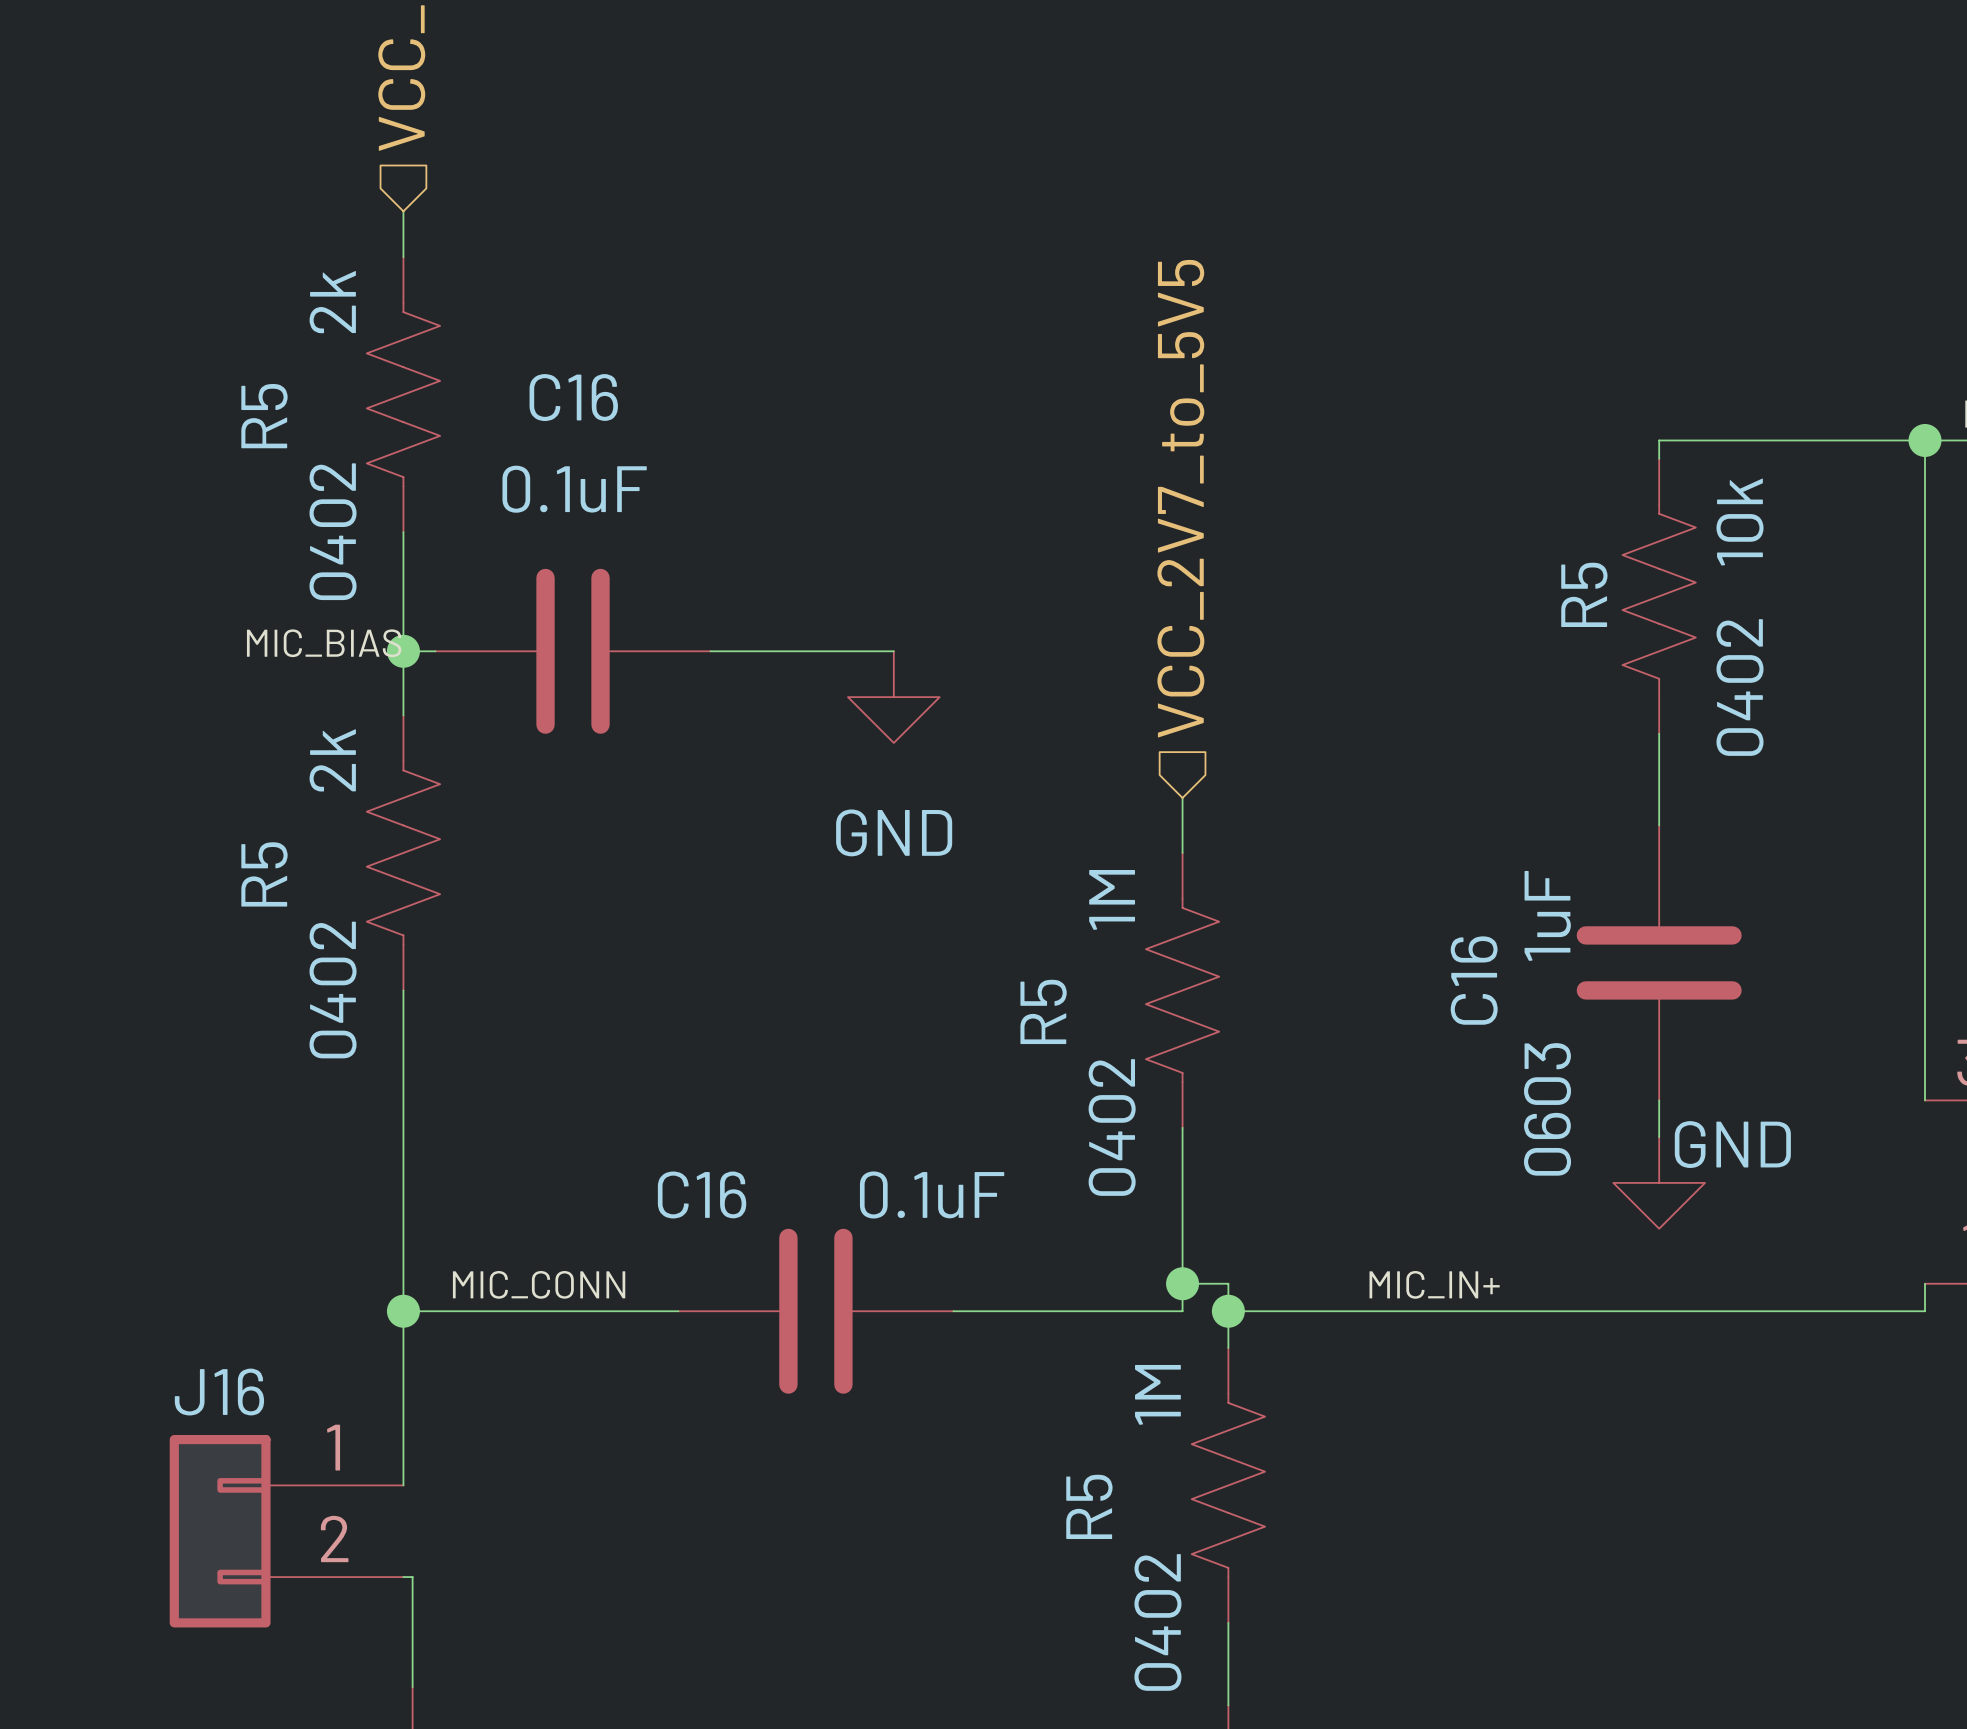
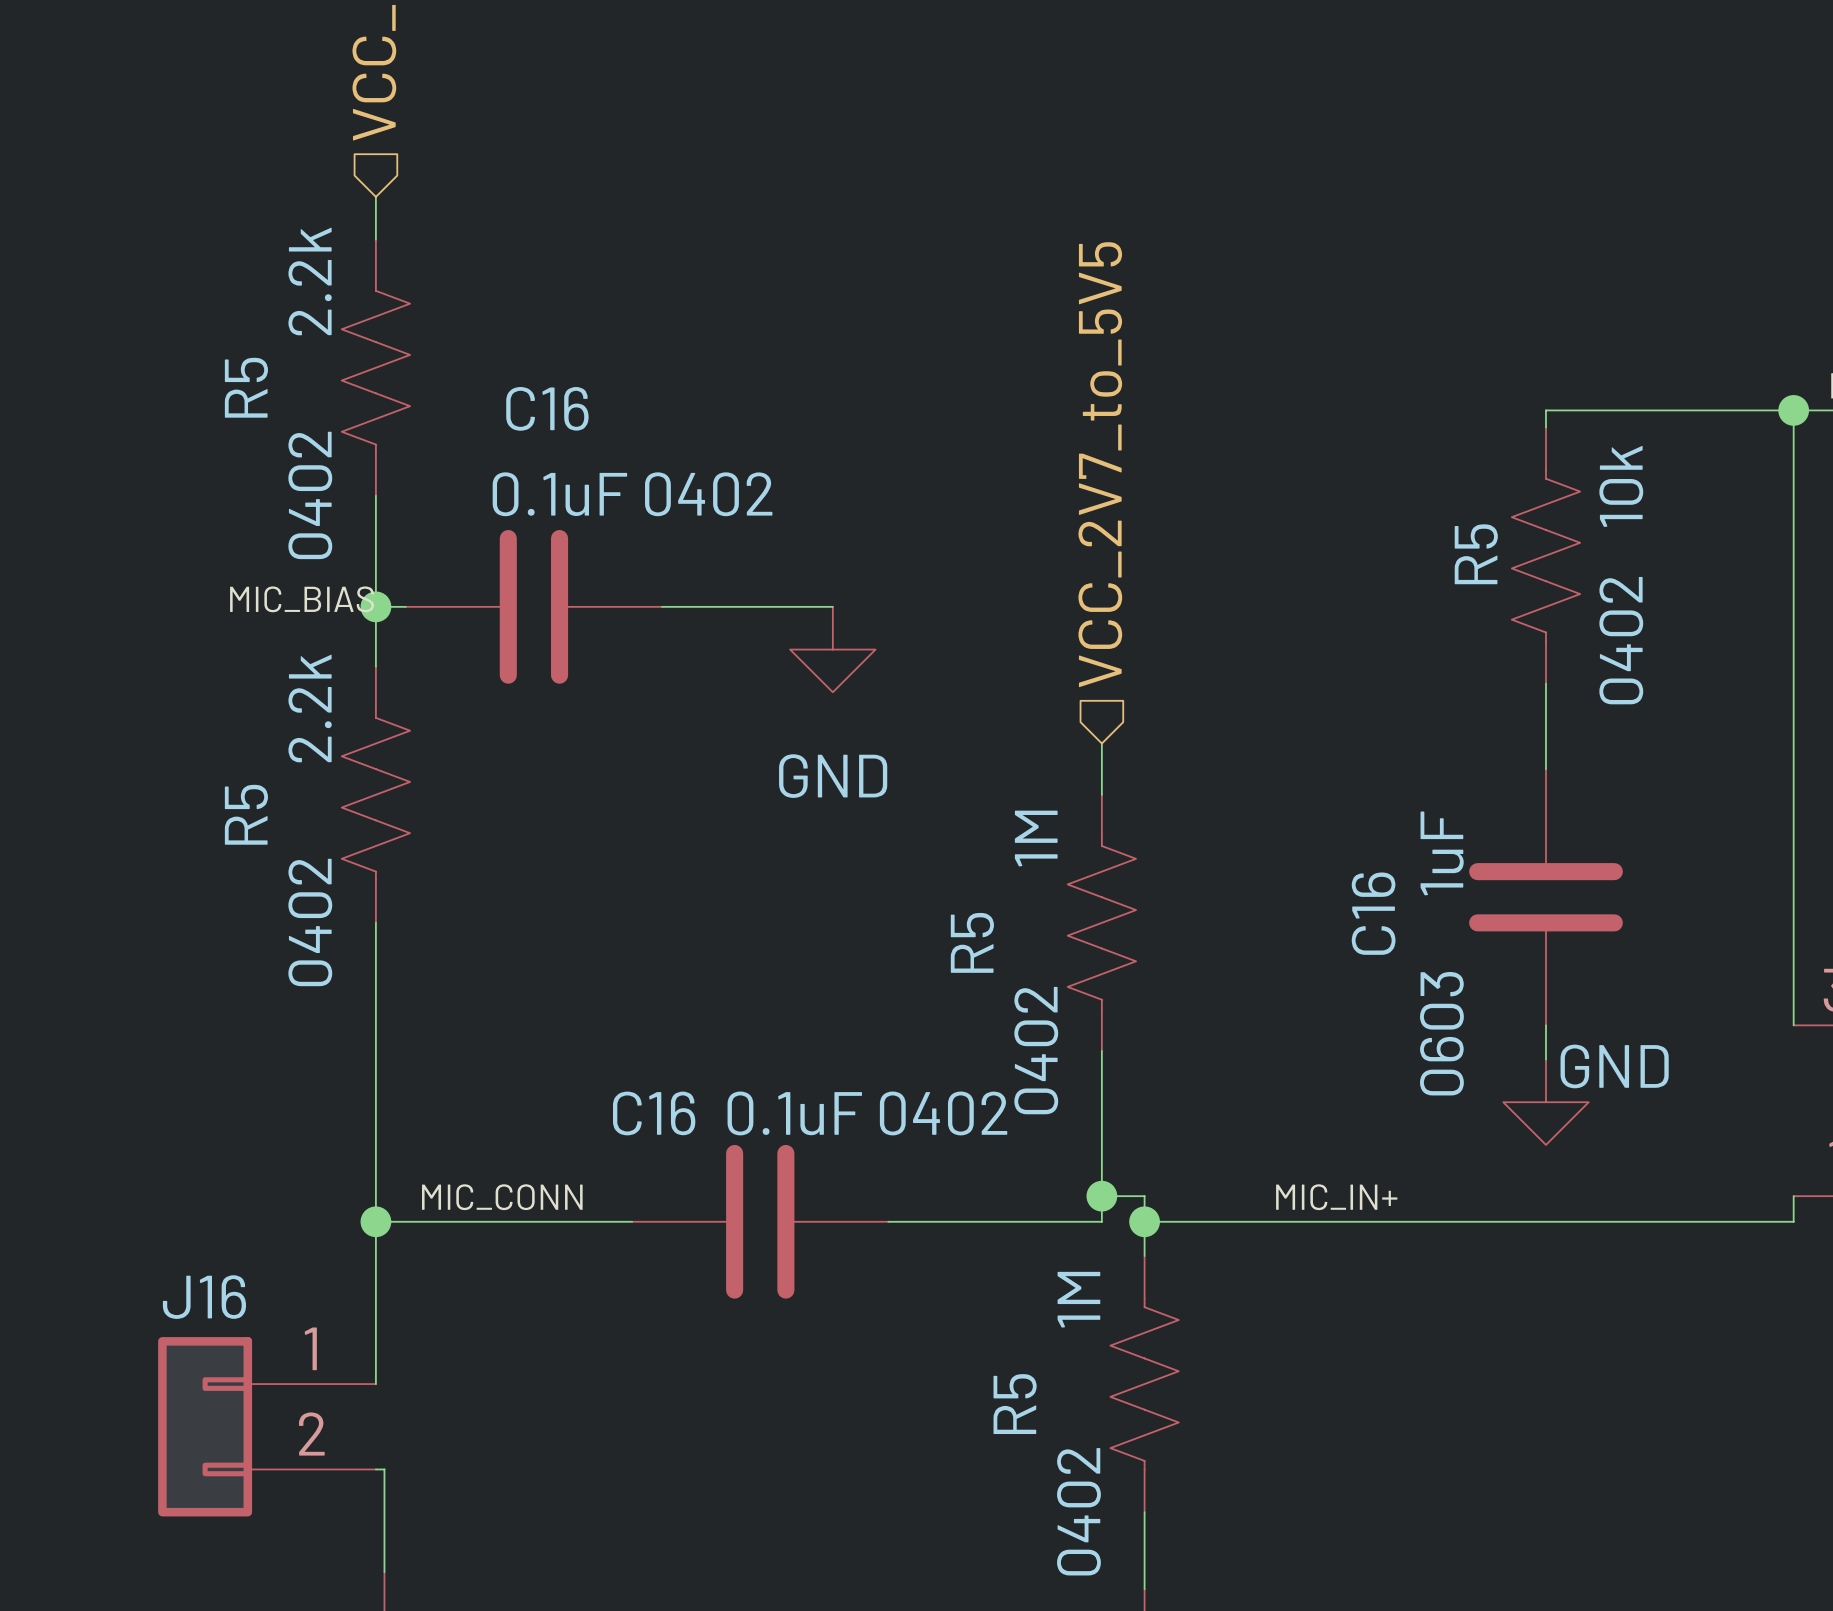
R5 value: 2k (332, 302) -> 2.2k (310, 281)
C16 name position: C16 (573, 397) -> C16 (547, 408)
C16 value: 0.1uF (574, 489) -> 0.1uF 0402 (632, 494)
R5 value: 2k (332, 760) -> 2.2k (310, 708)
C16 value: 0.1uF (932, 1194) -> 0.1uF 0402 (867, 1113)

